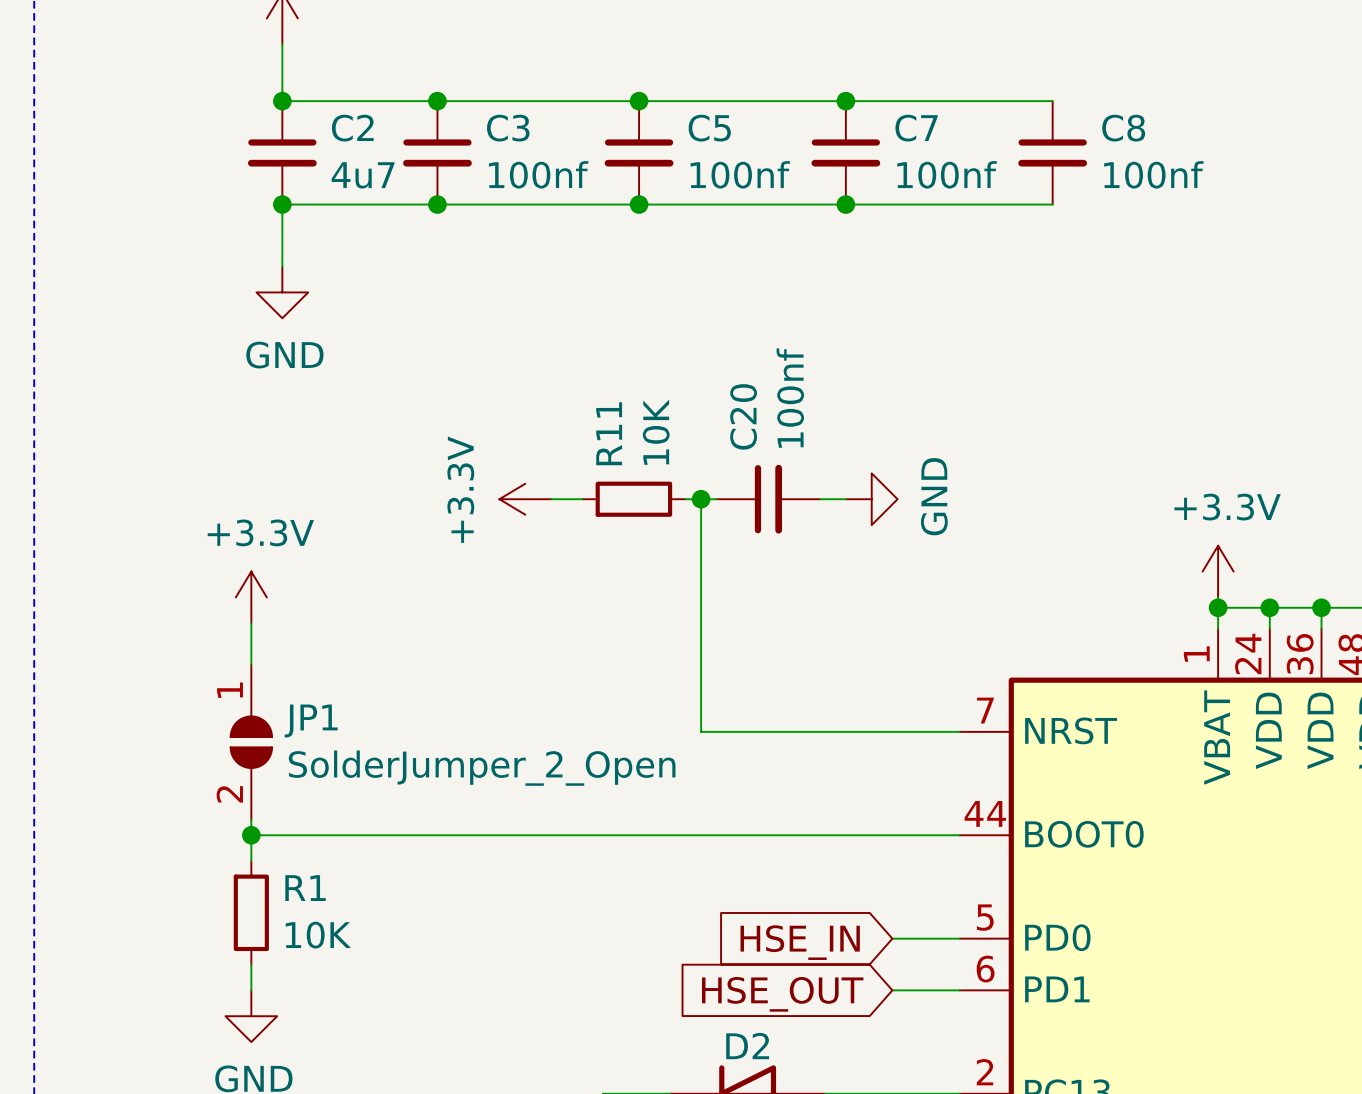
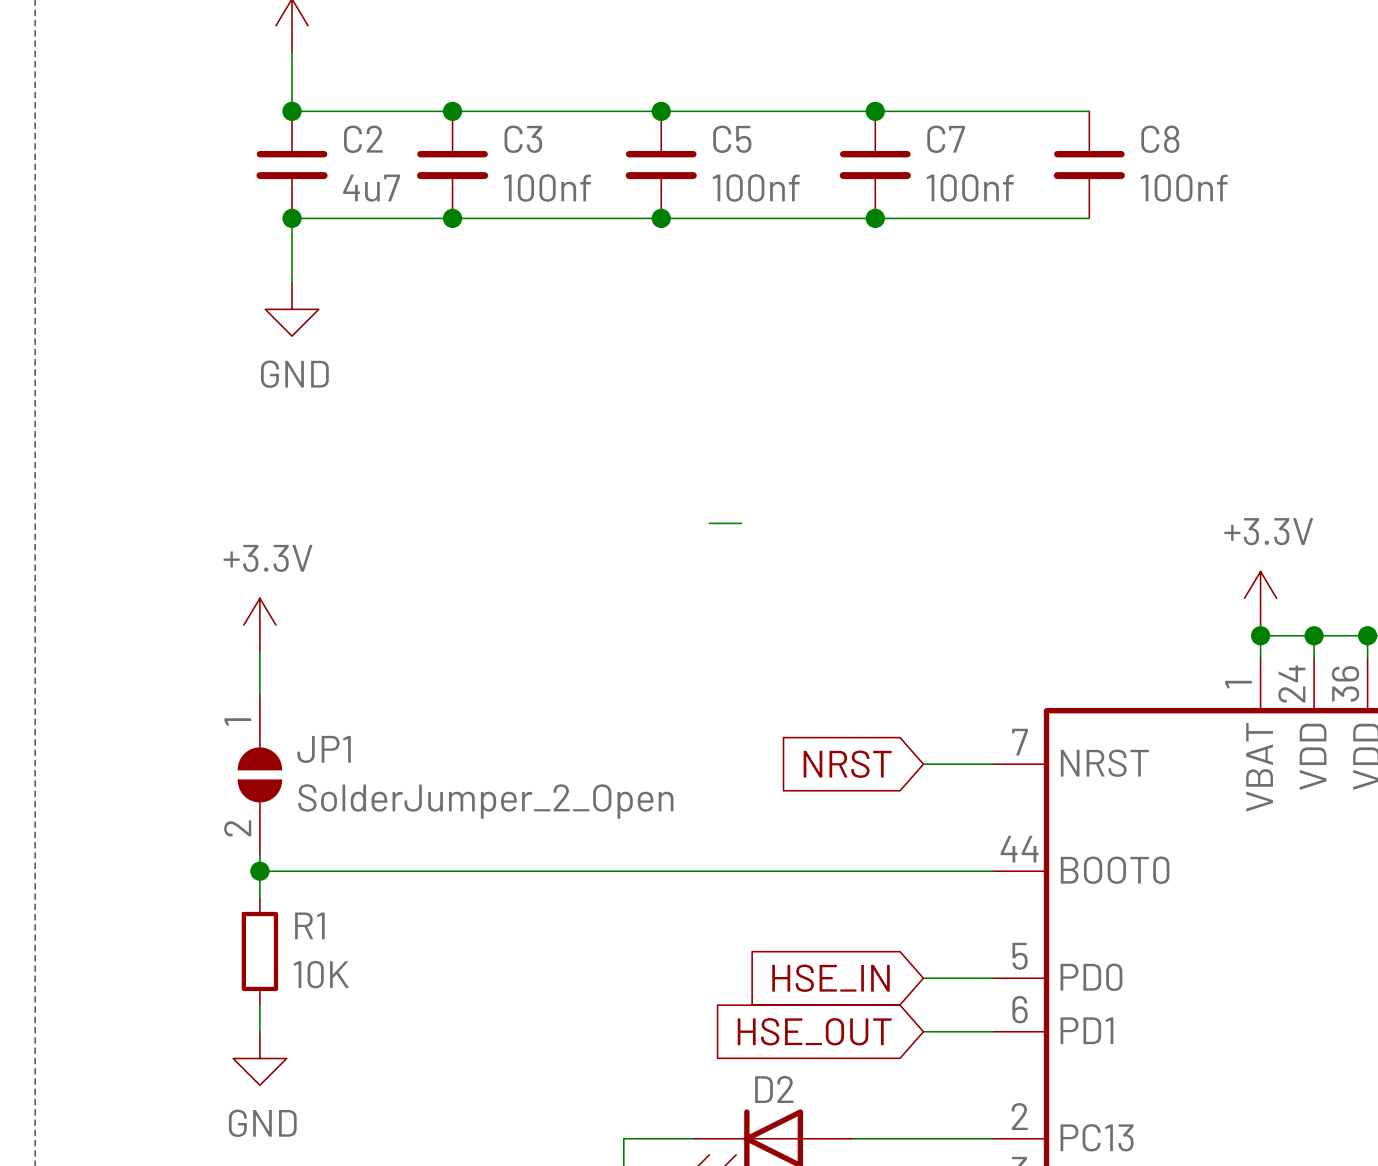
power symbol: +3.3V (525, 499) -> none
wire: (551, 499) (582, 499) -> none
R11: 10K (633, 499) -> none
wire: (701, 499) (701, 731) (892, 731) -> none
junction: (701, 499) -> none
C20: 100nf (768, 499) -> none
wire: (820, 499) (845, 499) -> none
power symbol: GND (871, 499) -> none
global label: none -> NRST (847, 764)

